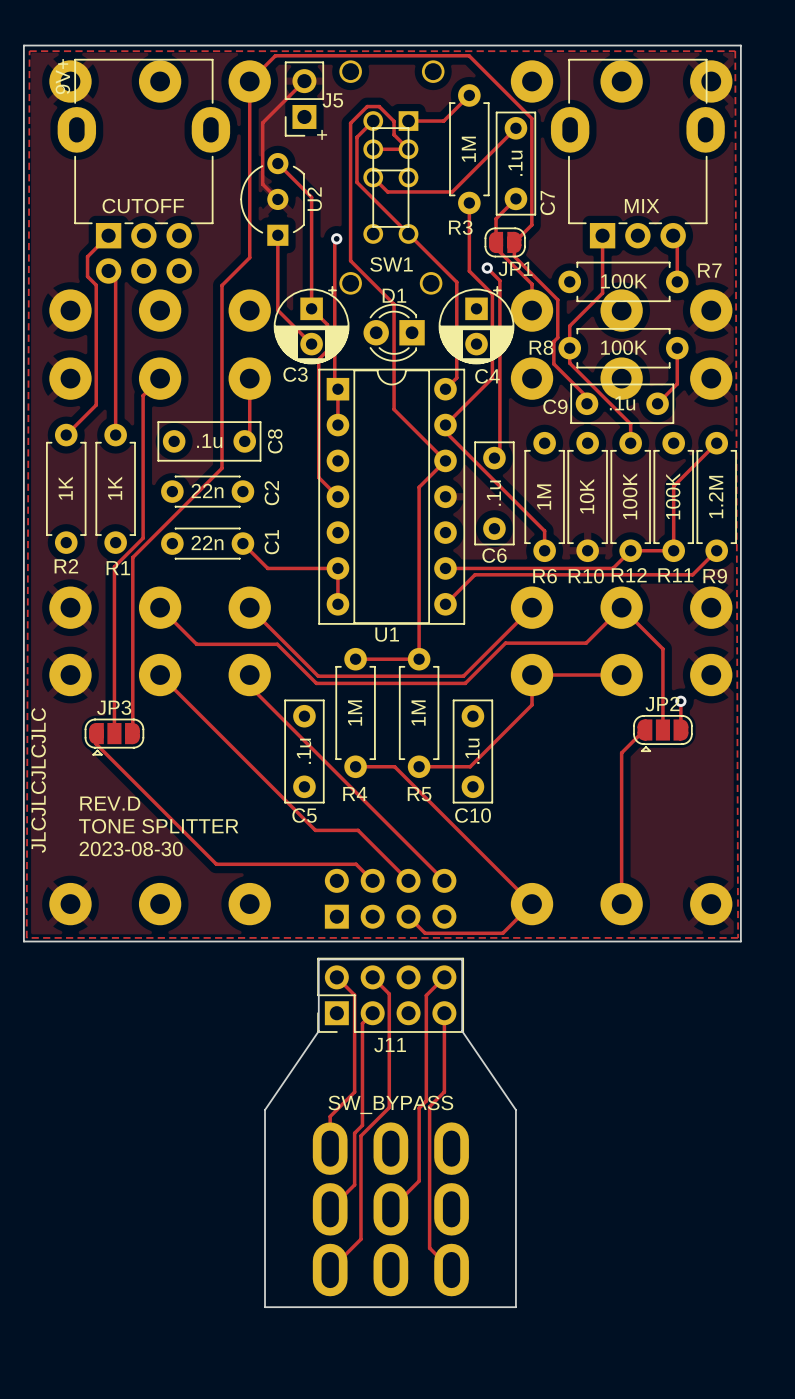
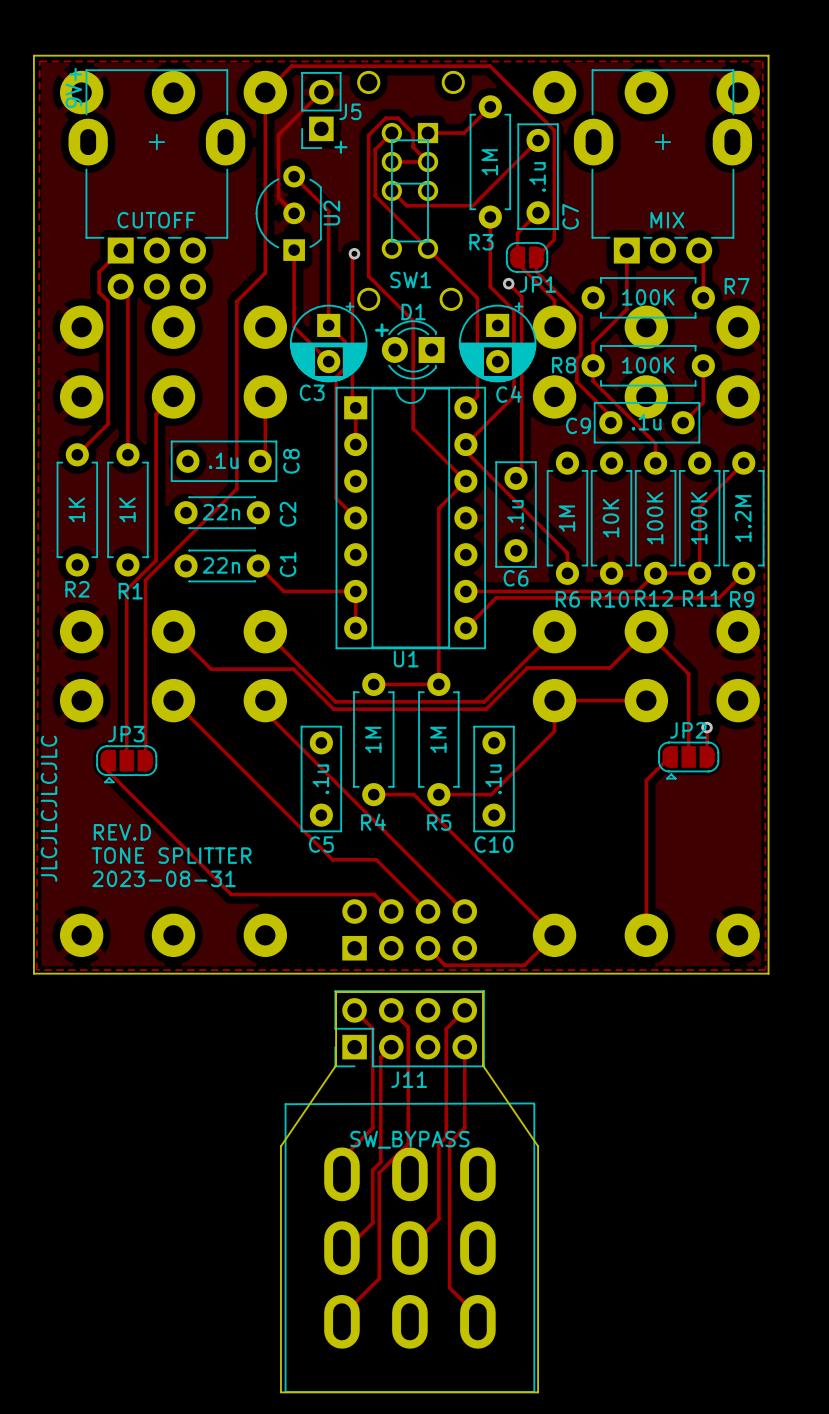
part footprint: [57, 58, 231, 284] -> [68, 69, 246, 300]
part footprint: [550, 58, 725, 249] -> [573, 69, 753, 264]
text: none -> + (381, 330)
text: 2023-08-30 (131, 848) -> 2023-08-31 (164, 878)
part footprint: [312, 1122, 469, 1297] -> [284, 1102, 536, 1393]
board edge: (265, 1307) (515, 1307) -> (280, 1348) (280, 1392) (538, 1392) (538, 1348)

